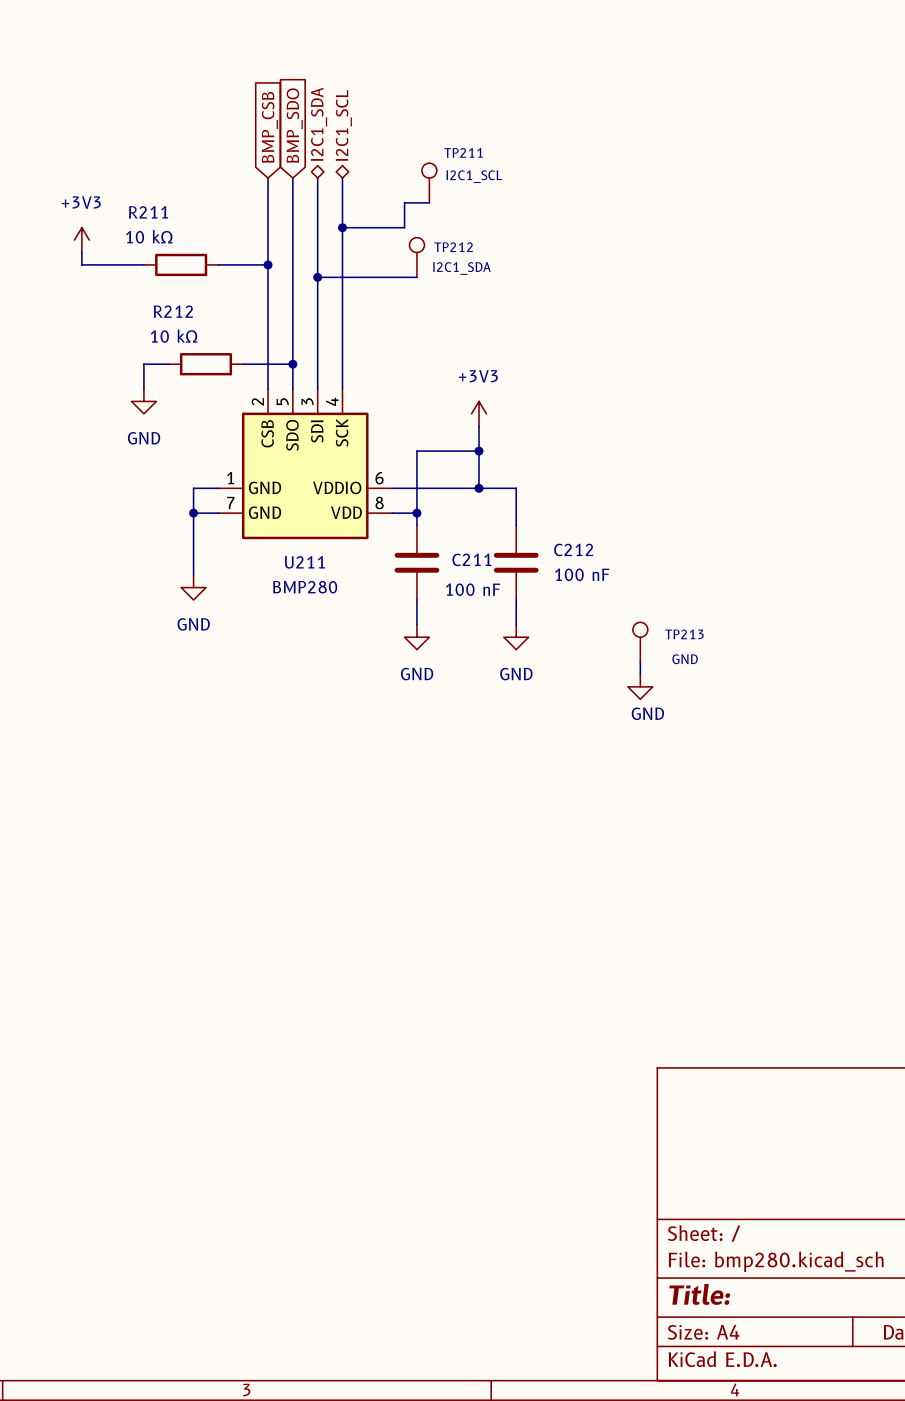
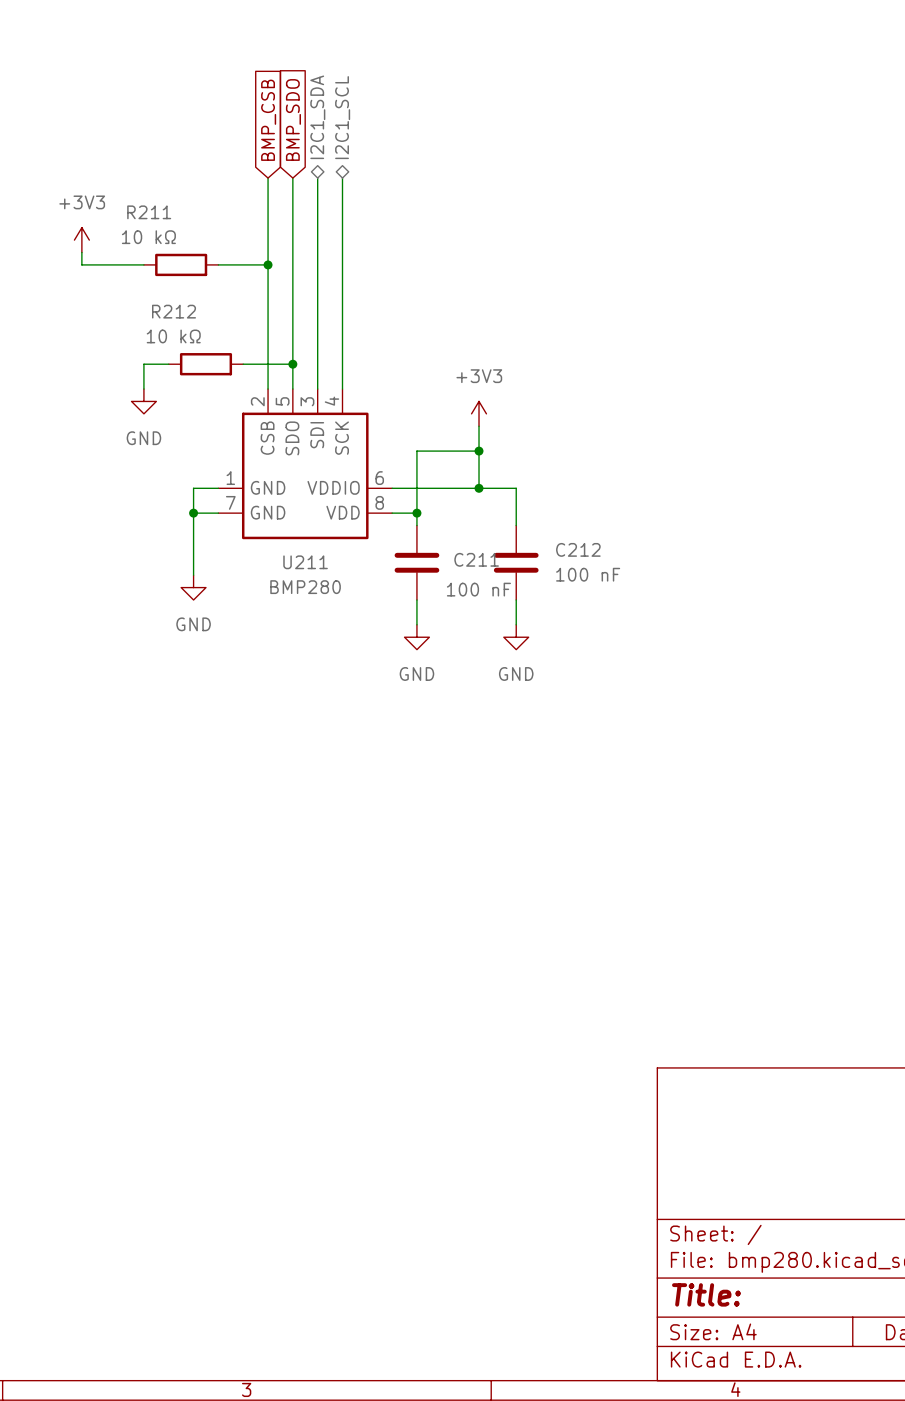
TP211: I2C1_SCL (429, 183) -> none
wire: (429, 202) (404, 202) (404, 227) (342, 227) -> none
junction: (342, 227) -> none
TP212: I2C1_SDA (416, 257) -> none
wire: (317, 277) (416, 277) -> none
junction: (317, 277) -> none
TP213: GND (640, 642) -> none
wire: (640, 662) (640, 674) -> none
power symbol: GND (640, 686) -> none

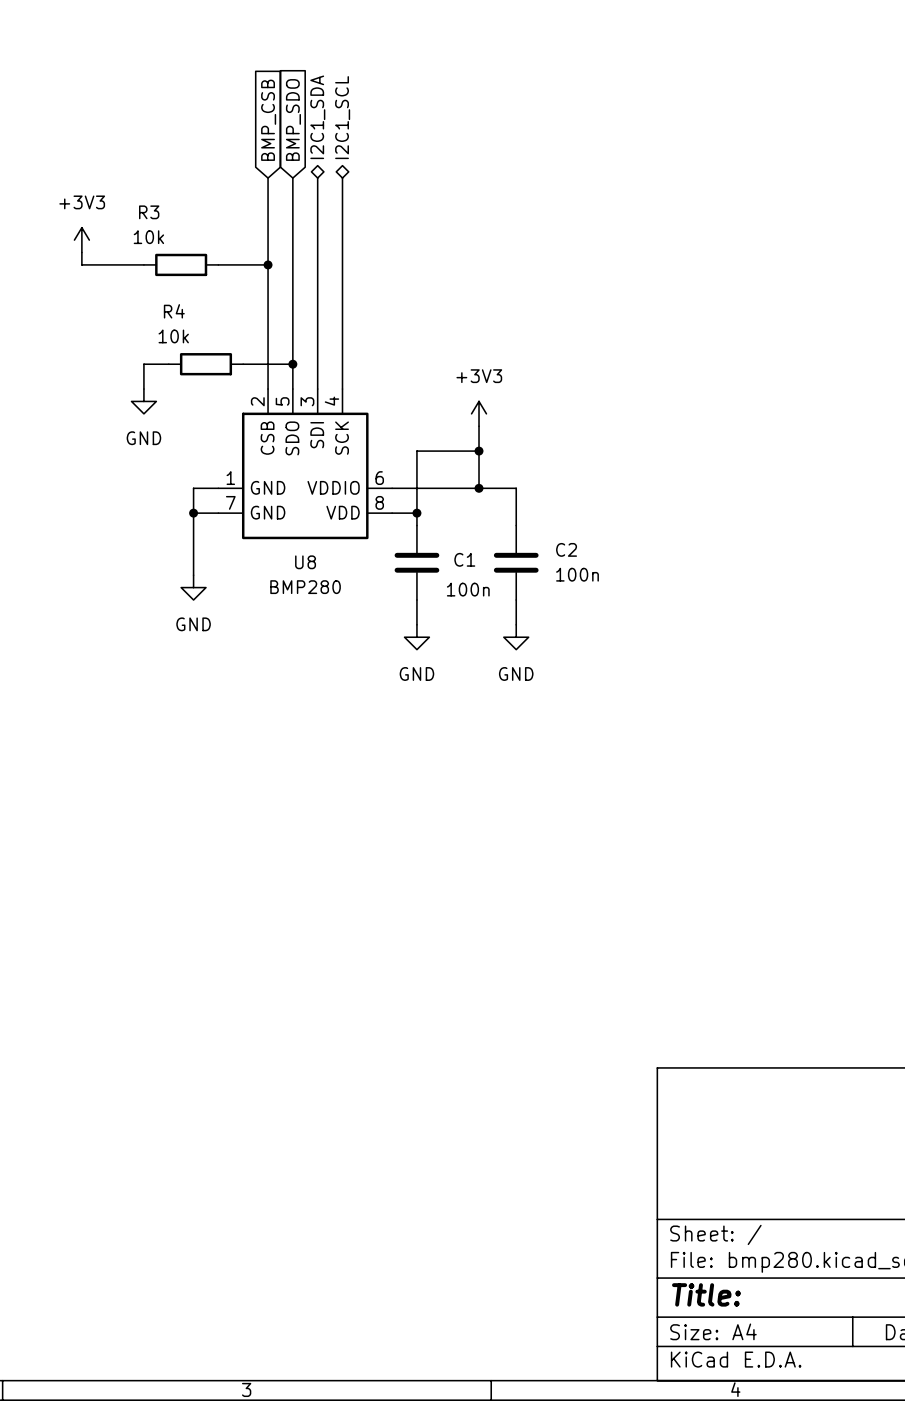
R211 name: R211 (149, 212) -> R3 (149, 212)
R211 value: 10 kΩ (148, 237) -> 10k (148, 237)
R212 name: R212 (174, 311) -> R4 (174, 311)
R212 value: 10 kΩ (173, 336) -> 10k (173, 336)
C212 name: C212 (578, 549) -> C2 (566, 549)
C211 name: C211 (476, 559) -> C1 (464, 559)
U211 name: U211 (305, 562) -> U8 (305, 562)
C212 value: 100 nF (588, 574) -> 100n (577, 574)
C211 value: 100 nF (478, 589) -> 100n (468, 589)

